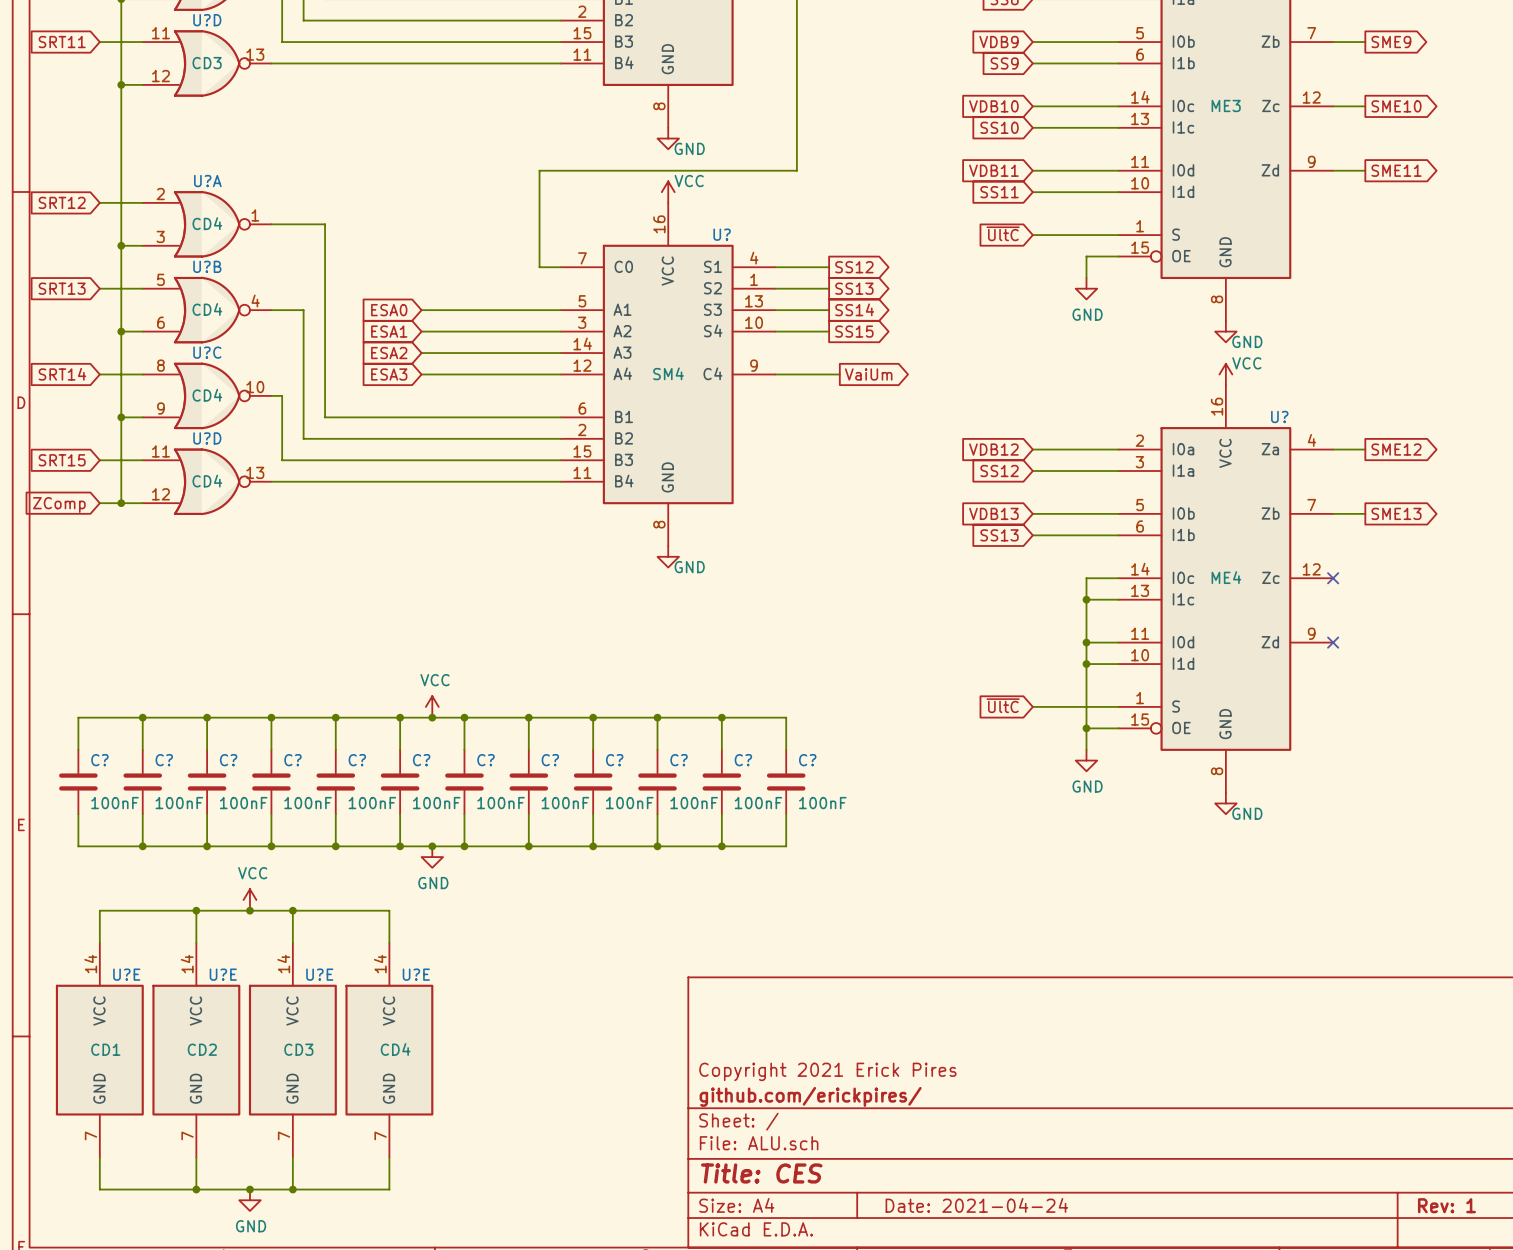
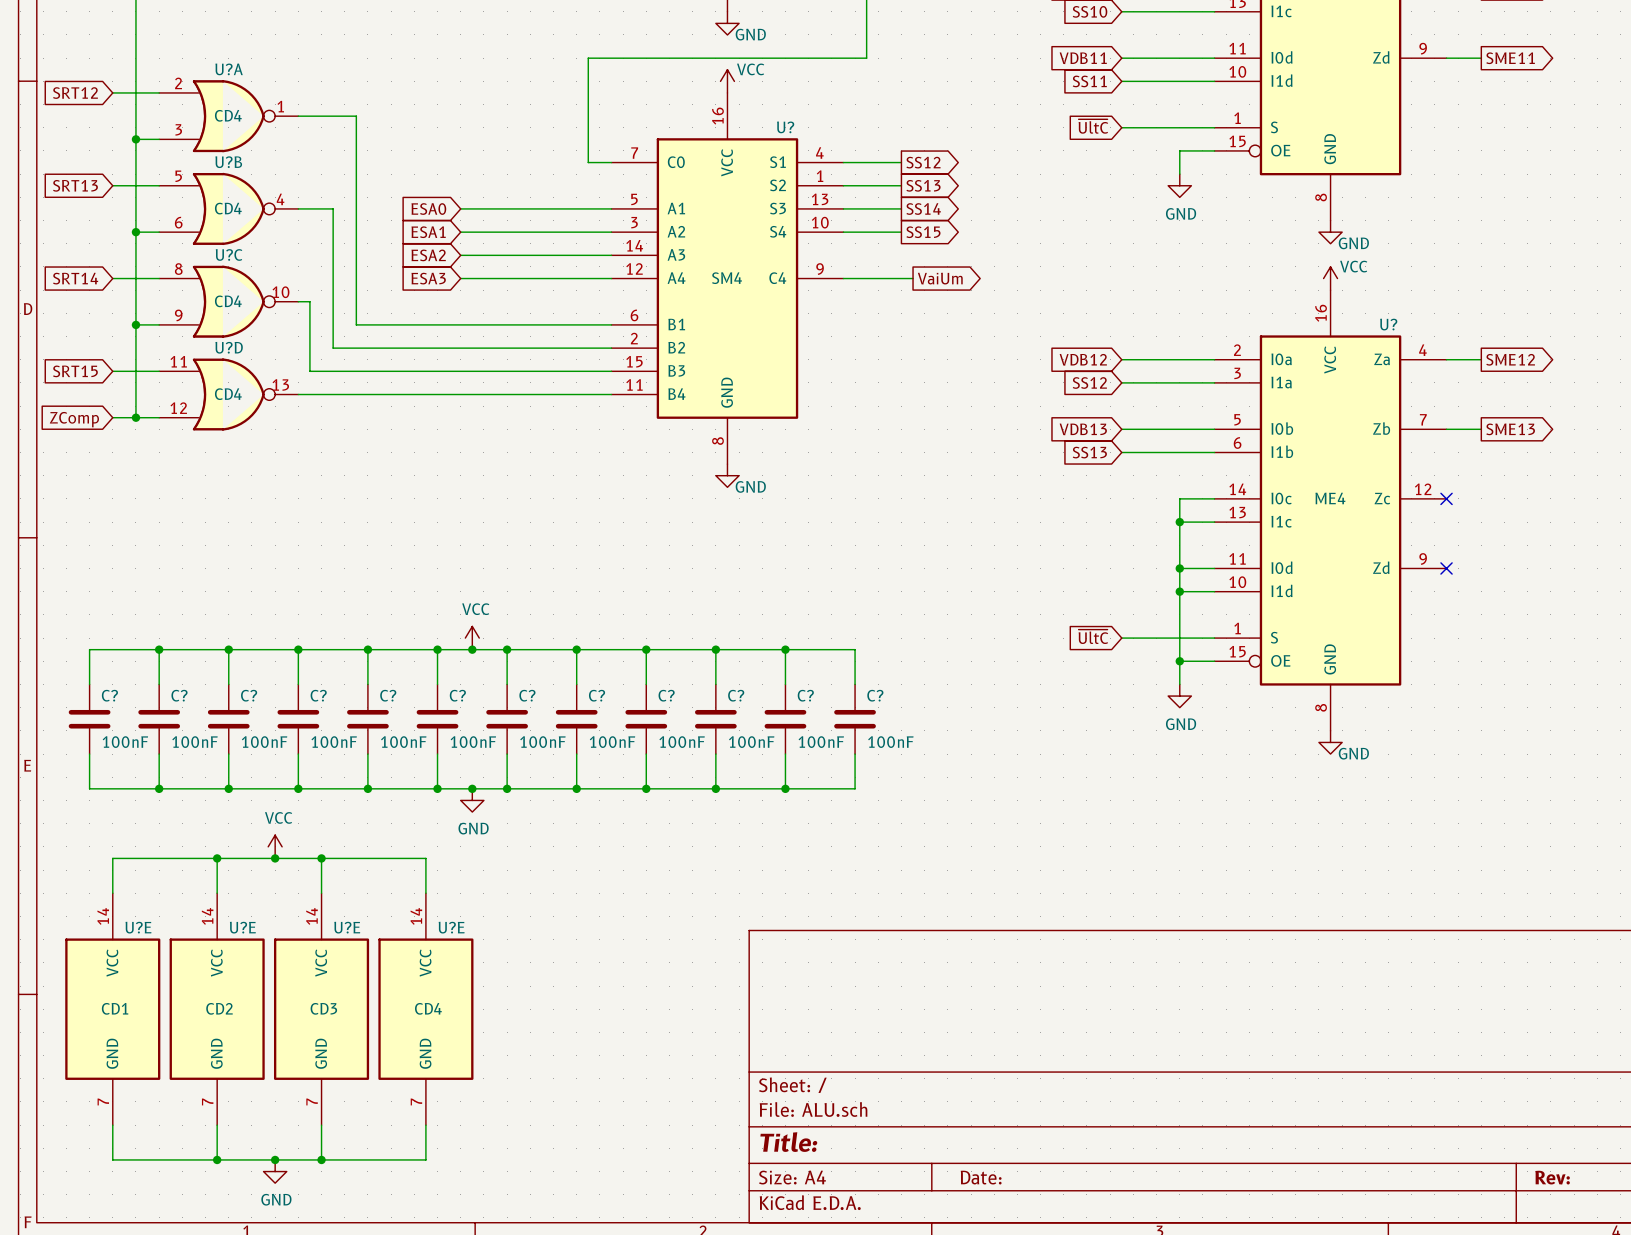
title block: Copyright 2021 Erick Pires (827, 1071) -> none
title block: github.com/erickpires/ (810, 1096) -> none
title block: Title: CES (761, 1173) -> Title: (788, 1142)
title block: Date: 2021-04-24 (976, 1205) -> Date: (981, 1177)
title block: Rev: 1 (1446, 1205) -> Rev: (1552, 1177)

